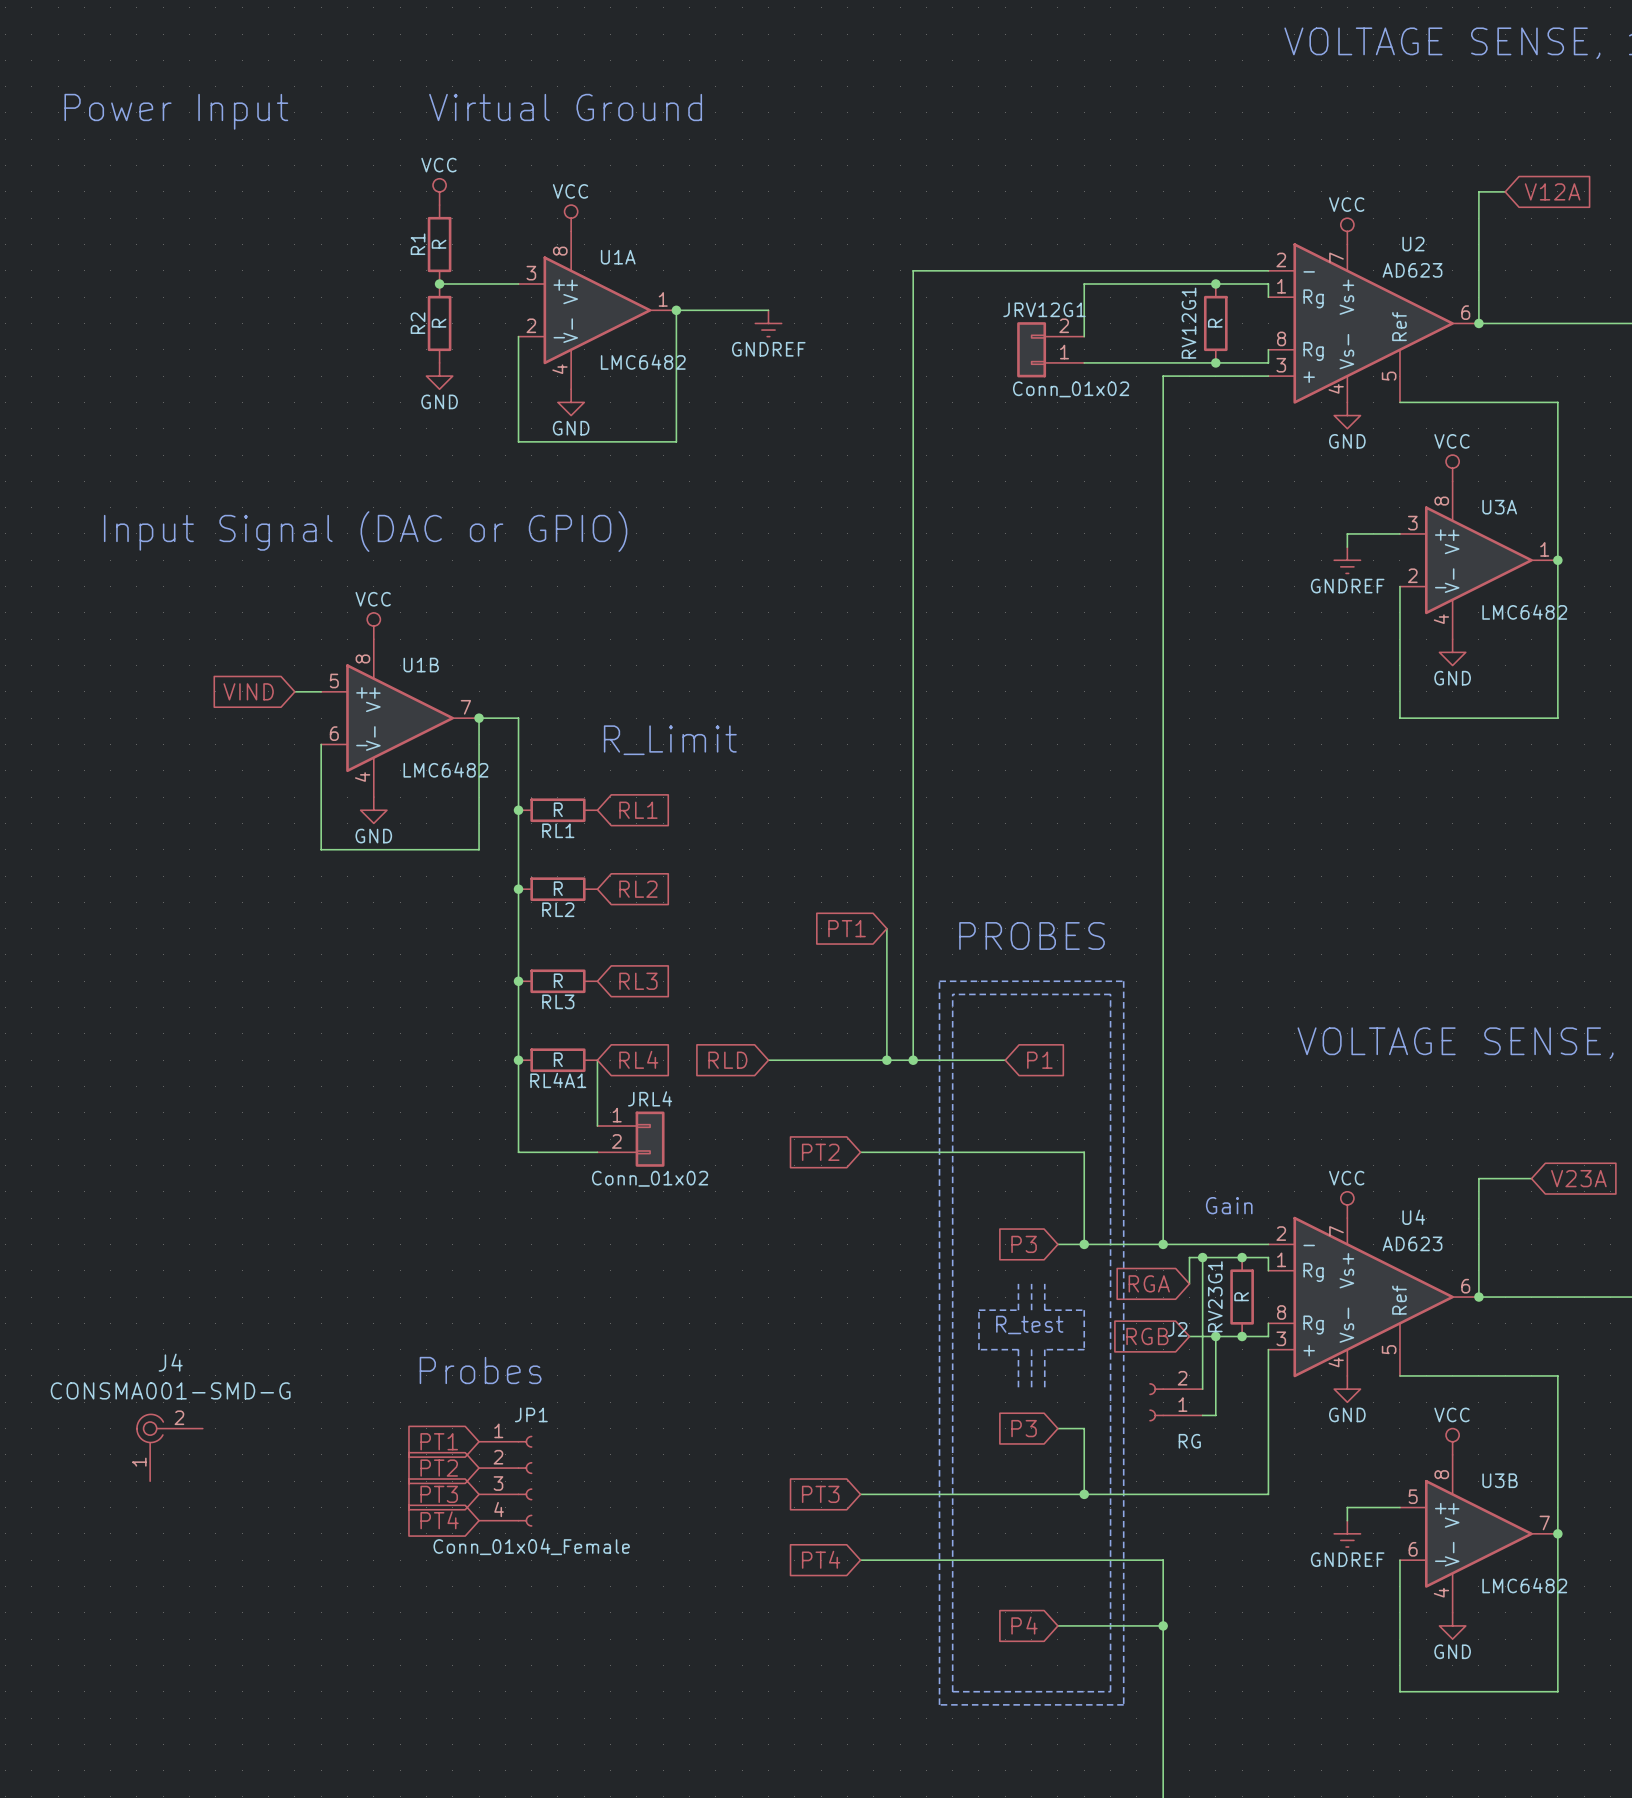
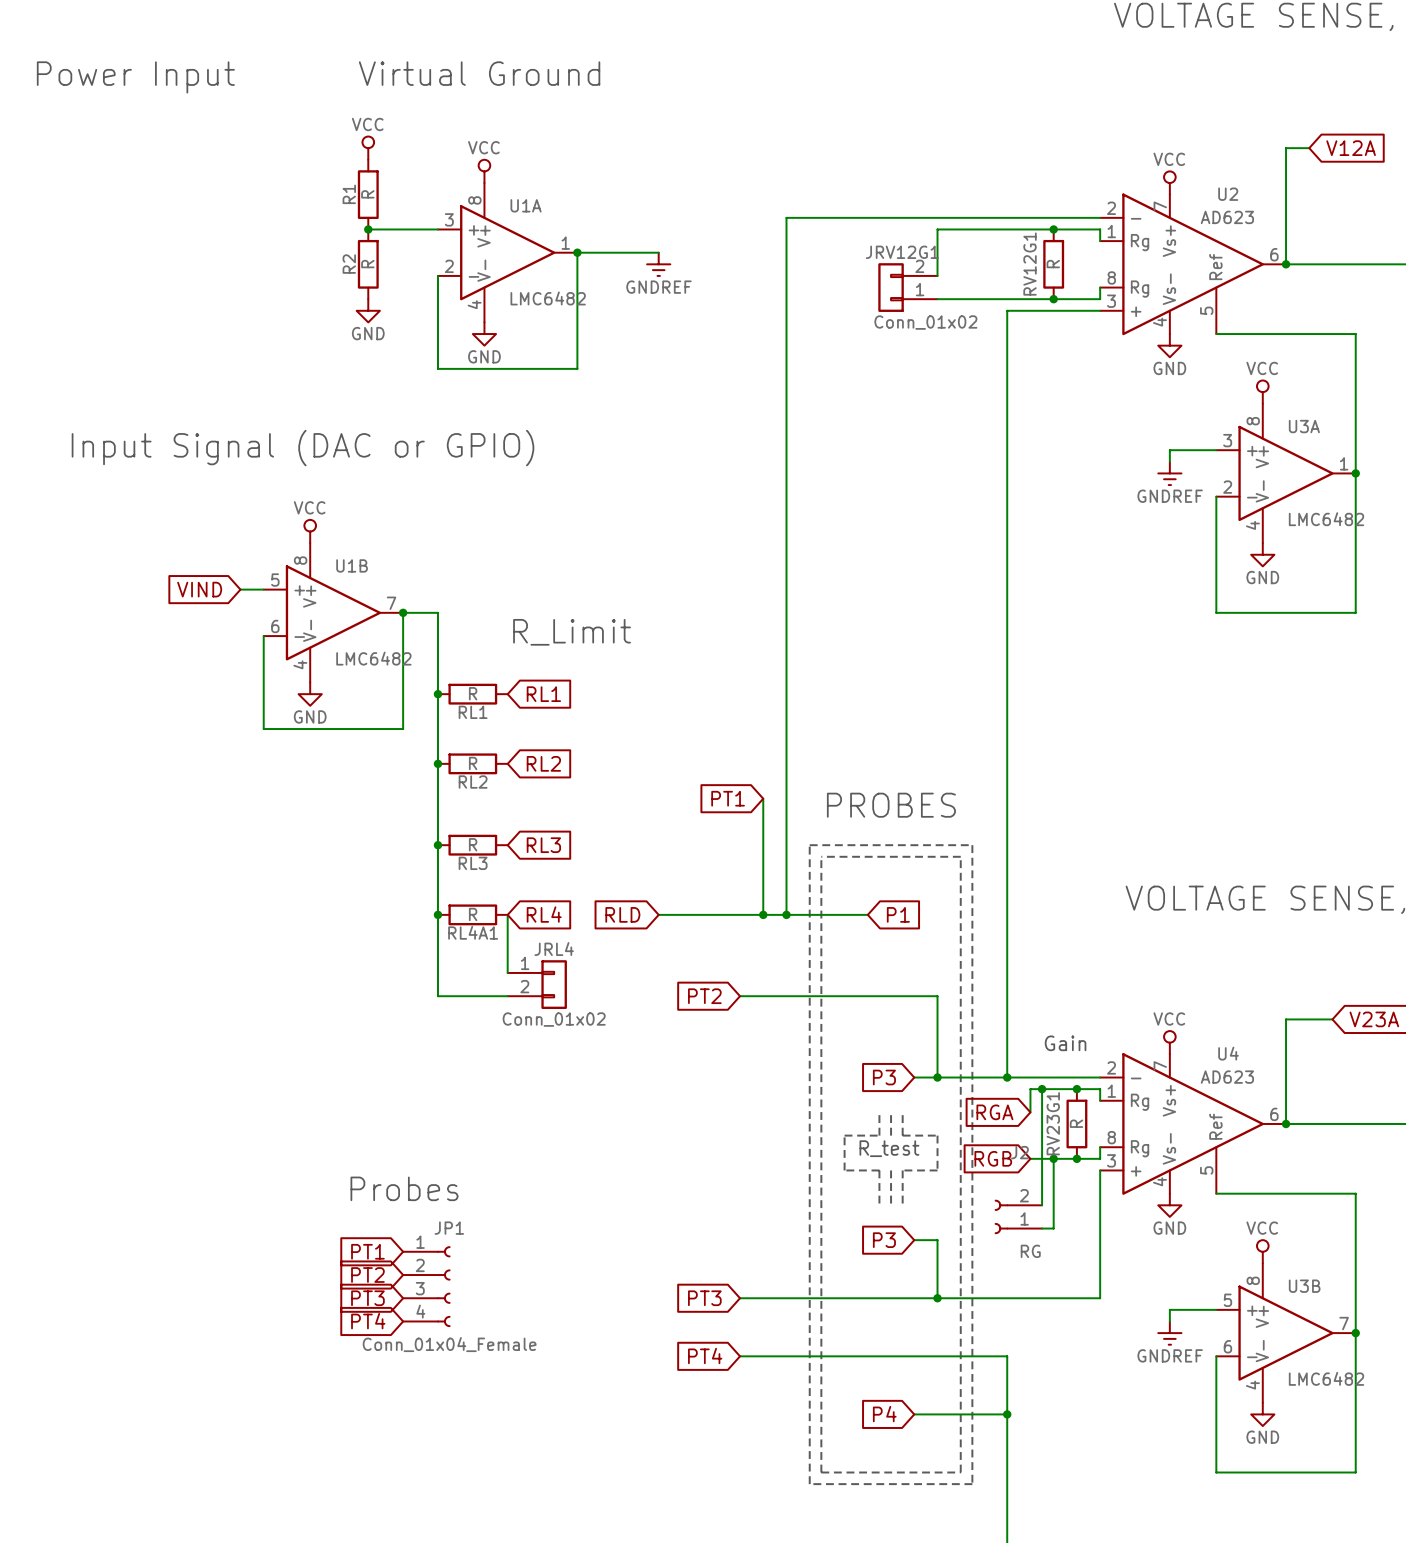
J4: CONSMA001-SMD-G (169, 1447) -> none

